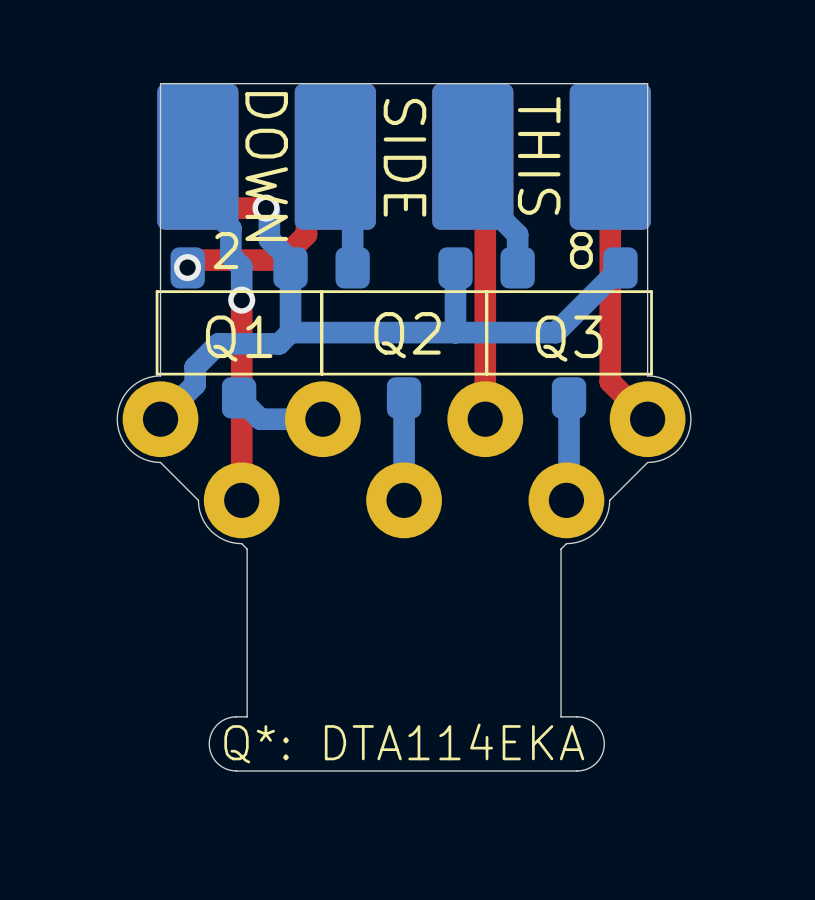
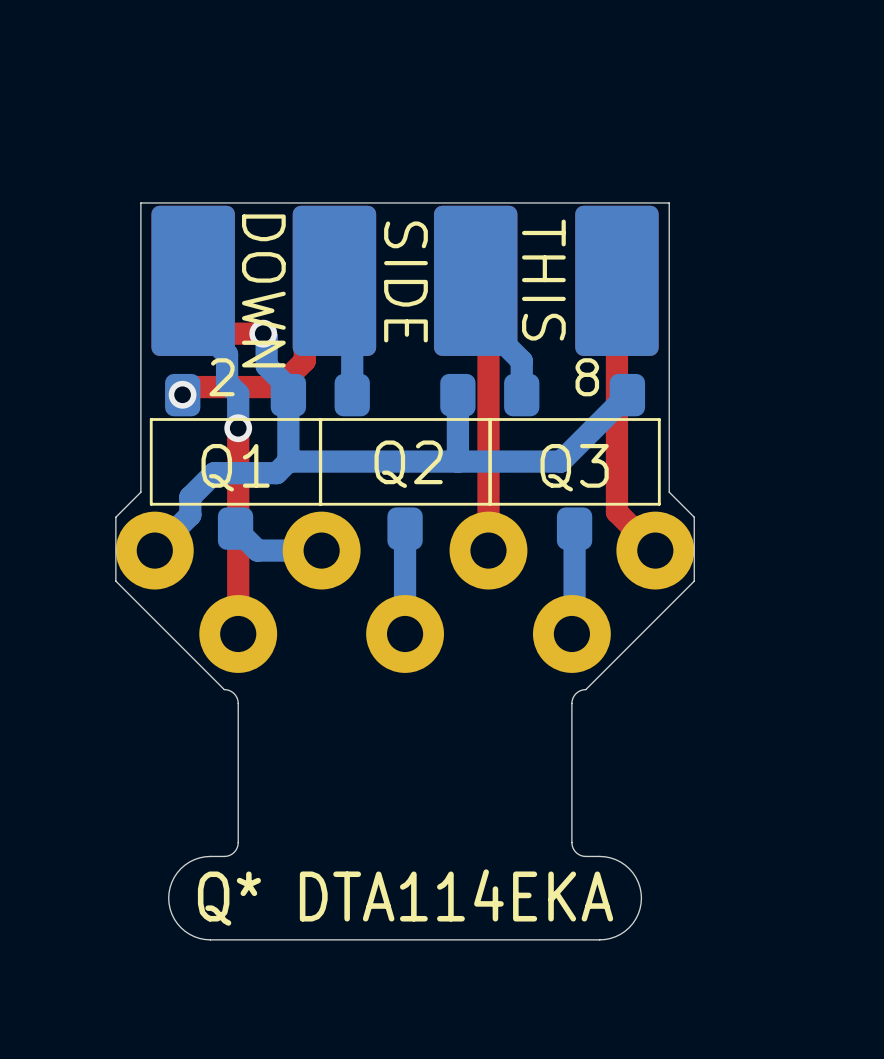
board edge: (647, 83) (647, 375) (664, 379) (681, 392) (689, 407) (690, 424) (687, 435) (678, 449) (664, 459) (647, 462) (609, 500) (606, 516) (597, 530) (583, 540) (566, 543) (561, 549) (561, 716) (584, 717) (596, 724) (604, 740) (600, 757) (590, 767) (577, 770) (236, 770) (222, 767) (211, 754) (209, 743) (211, 733) (217, 724) (225, 718) (247, 716) (247, 549) (241, 543) (225, 540) (211, 530) (201, 516) (198, 500) (160, 462) (143, 459) (129, 449) (120, 435) (117, 424) (118, 407) (126, 392) (143, 379) (160, 375) (160, 83) (647, 83) -> (669, 202) (669, 492) (694, 517) (694, 581) (585, 689) (575, 693) (571, 703) (572, 846) (580, 855) (610, 857) (625, 865) (632, 872) (638, 882) (641, 898) (635, 919) (620, 934) (599, 939) (210, 939) (189, 934) (177, 923) (170, 908) (169, 892) (174, 877) (180, 868) (194, 859) (204, 856) (227, 855) (234, 852) (237, 846) (238, 701) (234, 693) (224, 689) (115, 581) (115, 517) (140, 492) (140, 202) (669, 202)
text: Q*: DTA114EKA (404, 743) -> Q* DTA114EKA (405, 897)

